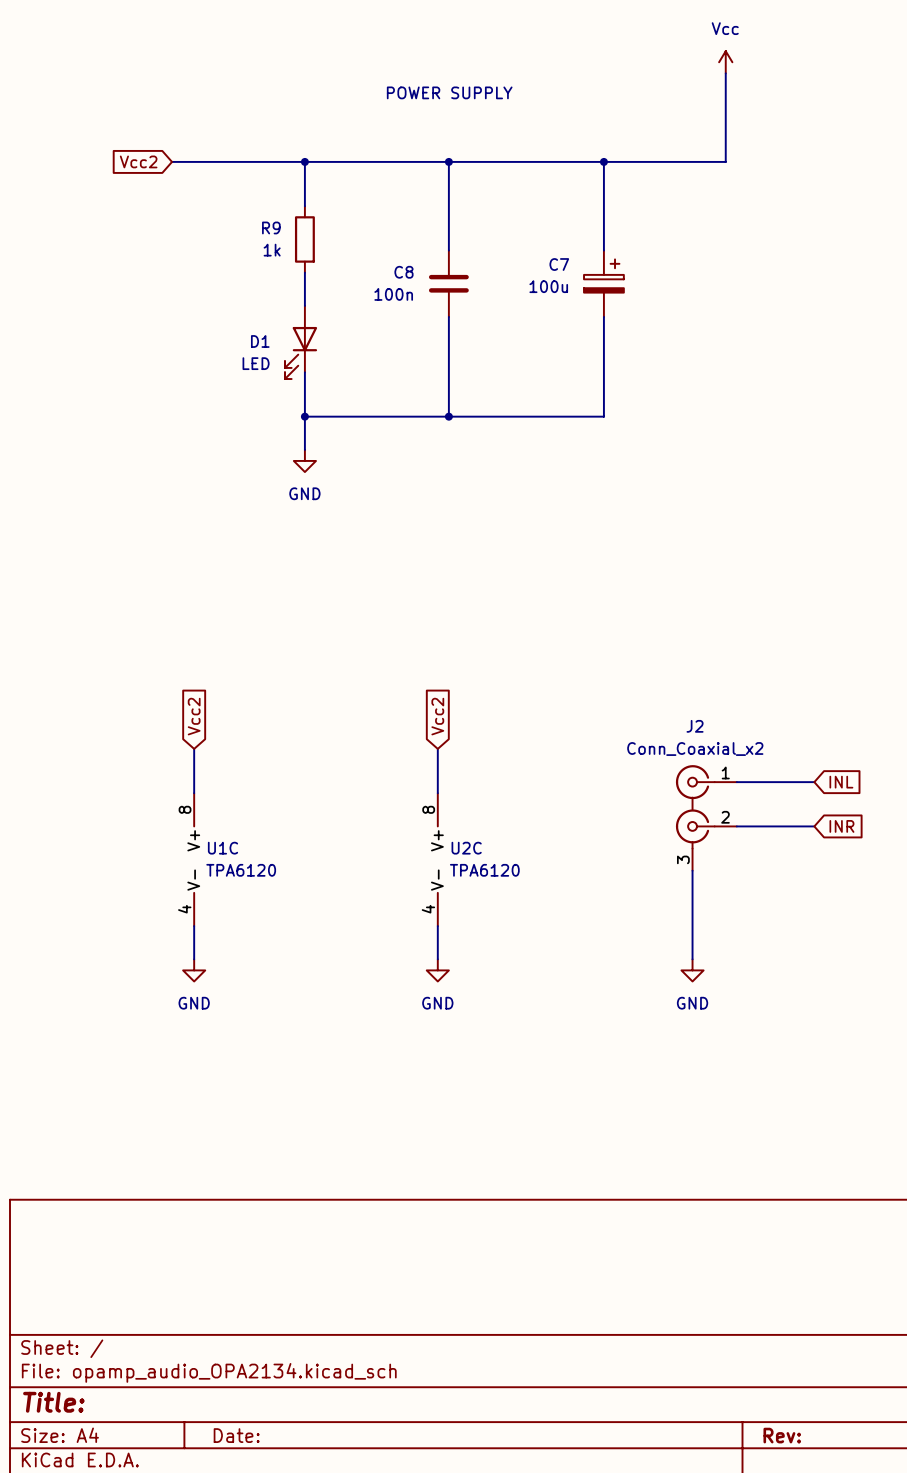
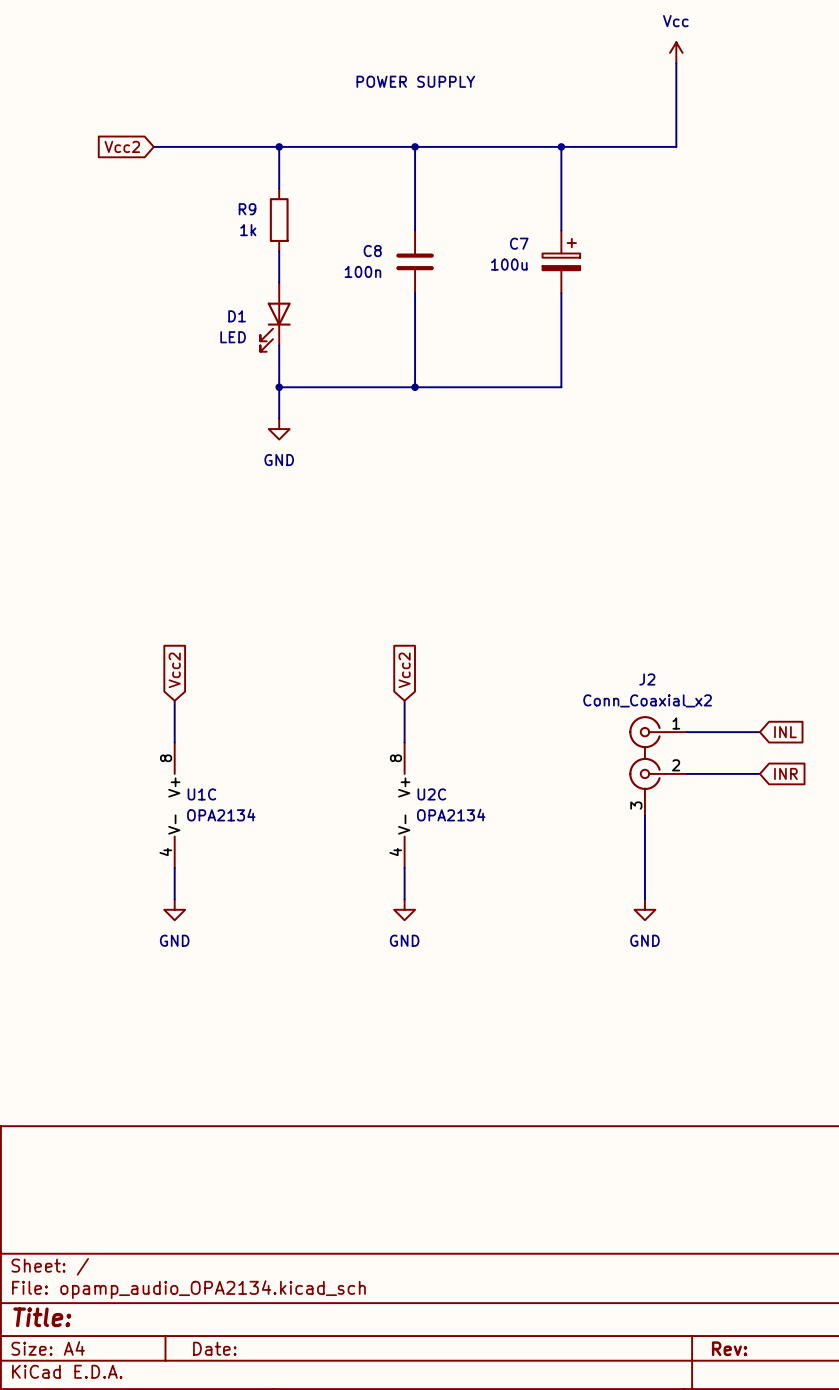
U1C value: TPA6120 (241, 870) -> OPA2134 (221, 815)
U2C value: TPA6120 (484, 870) -> OPA2134 (451, 815)

